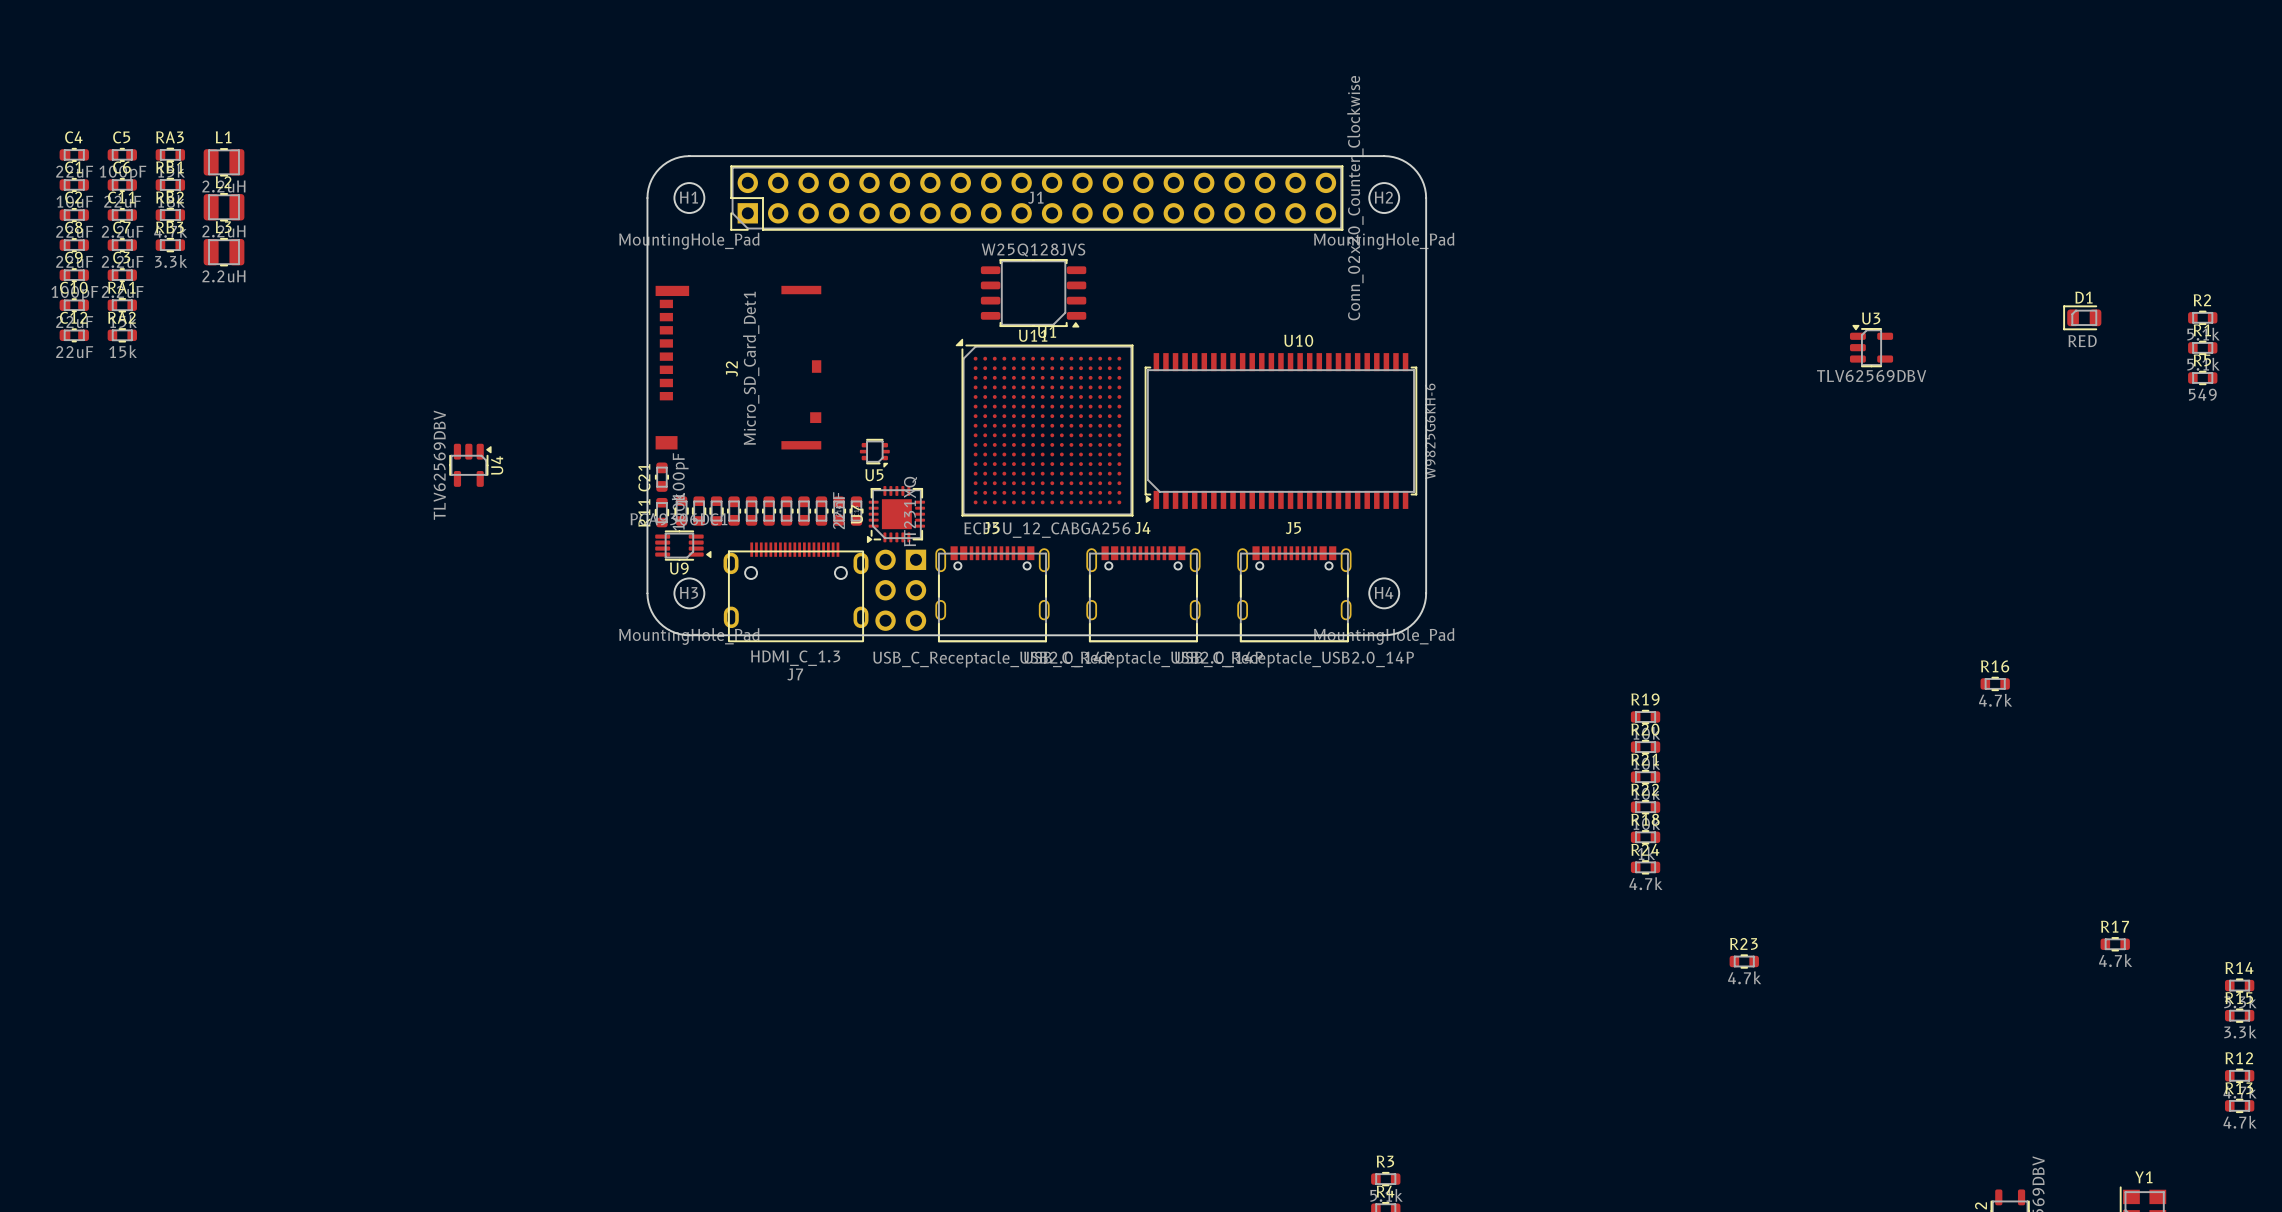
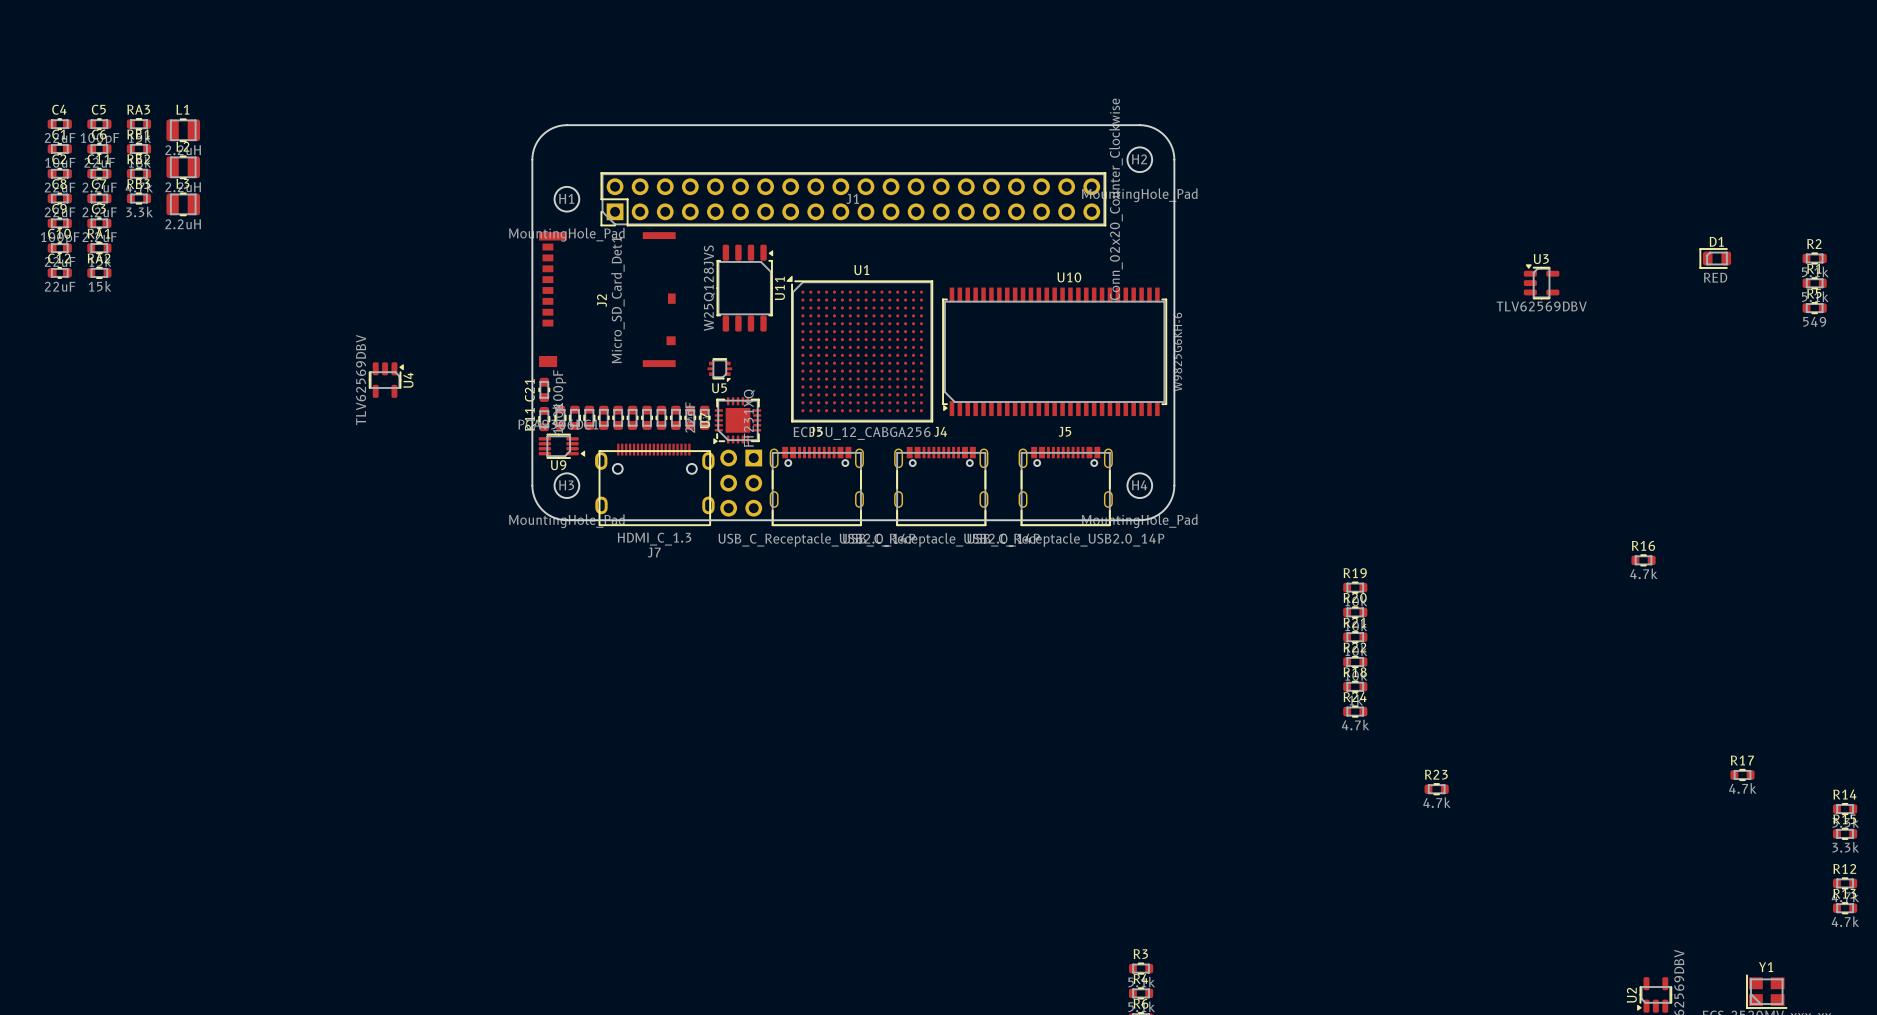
H1 position: (689, 198) -> (566, 199)
J1 position: (1036, 198) -> (853, 199)
U11 rotation: 0° (1033, 293) -> 90° counterclockwise (745, 288)
U11 position: (1033, 293) -> (745, 288)

